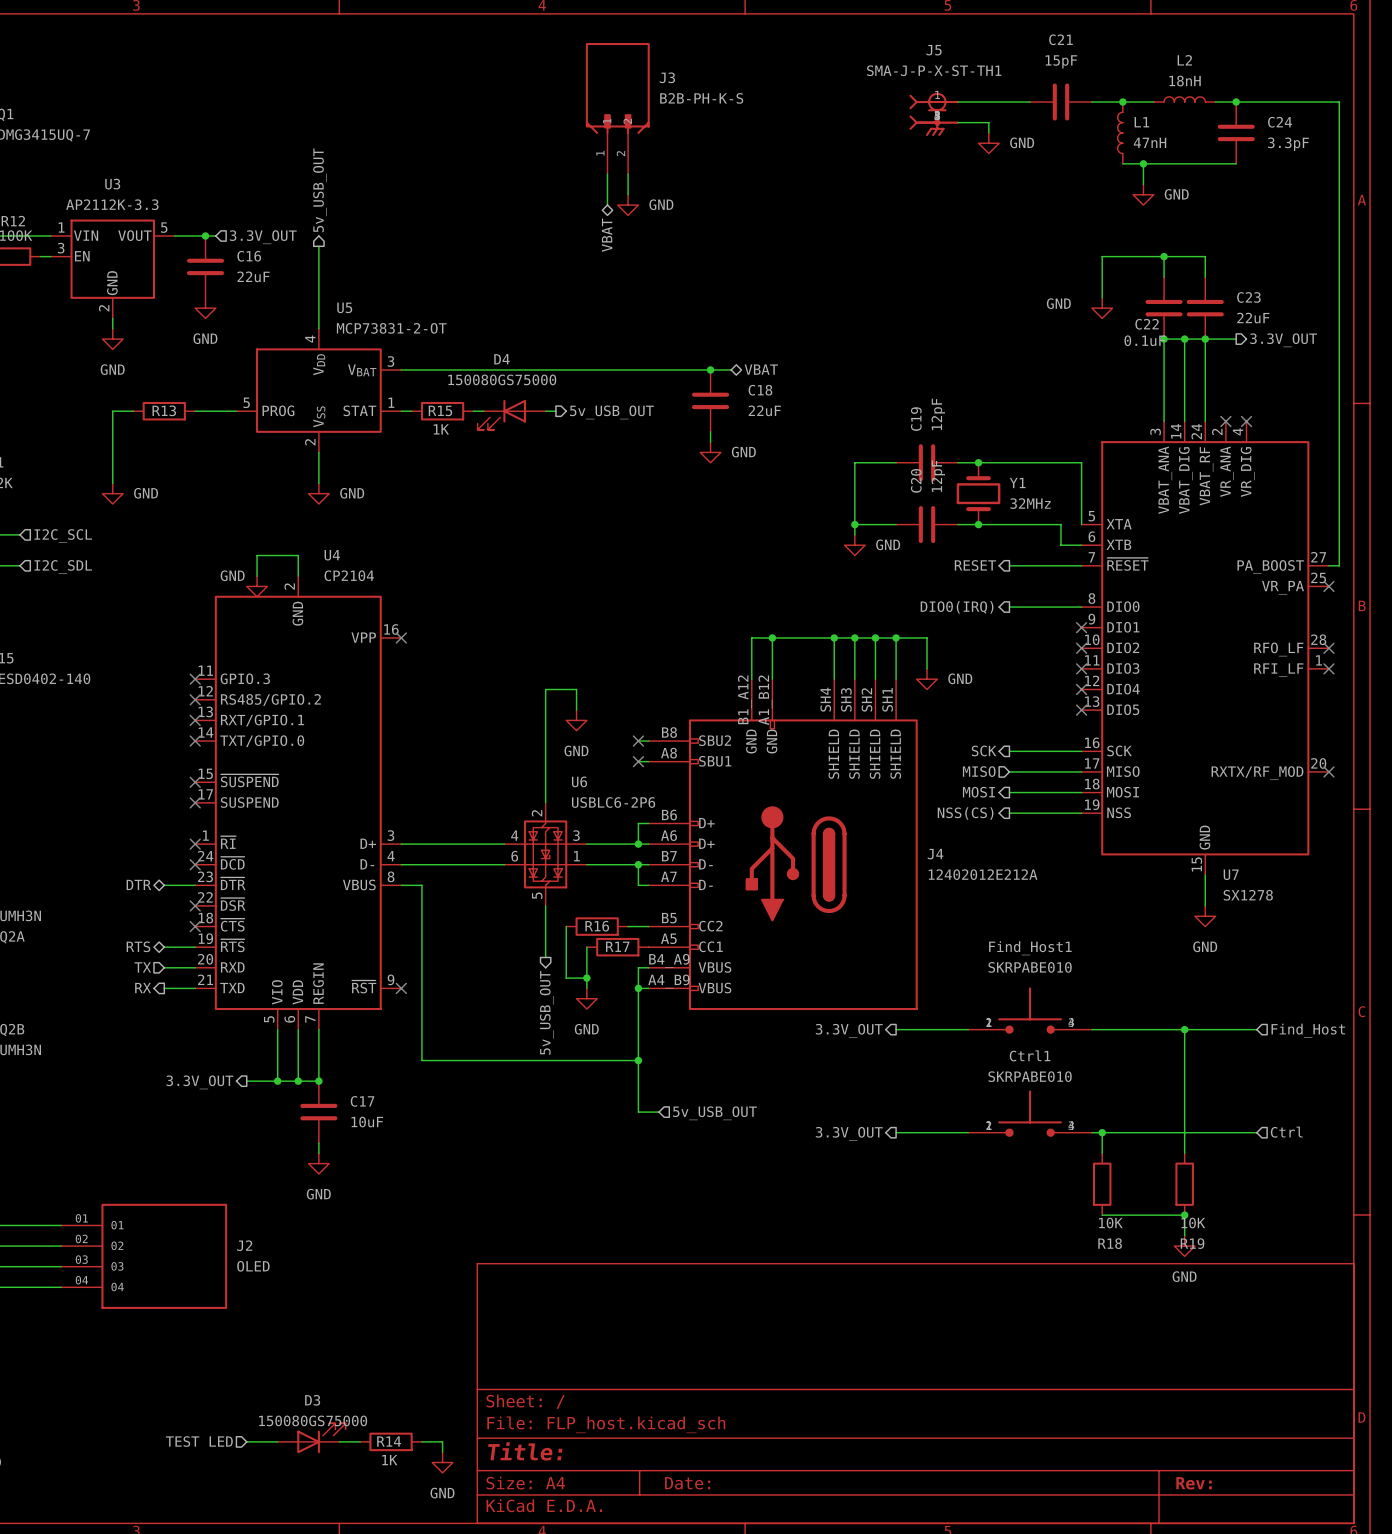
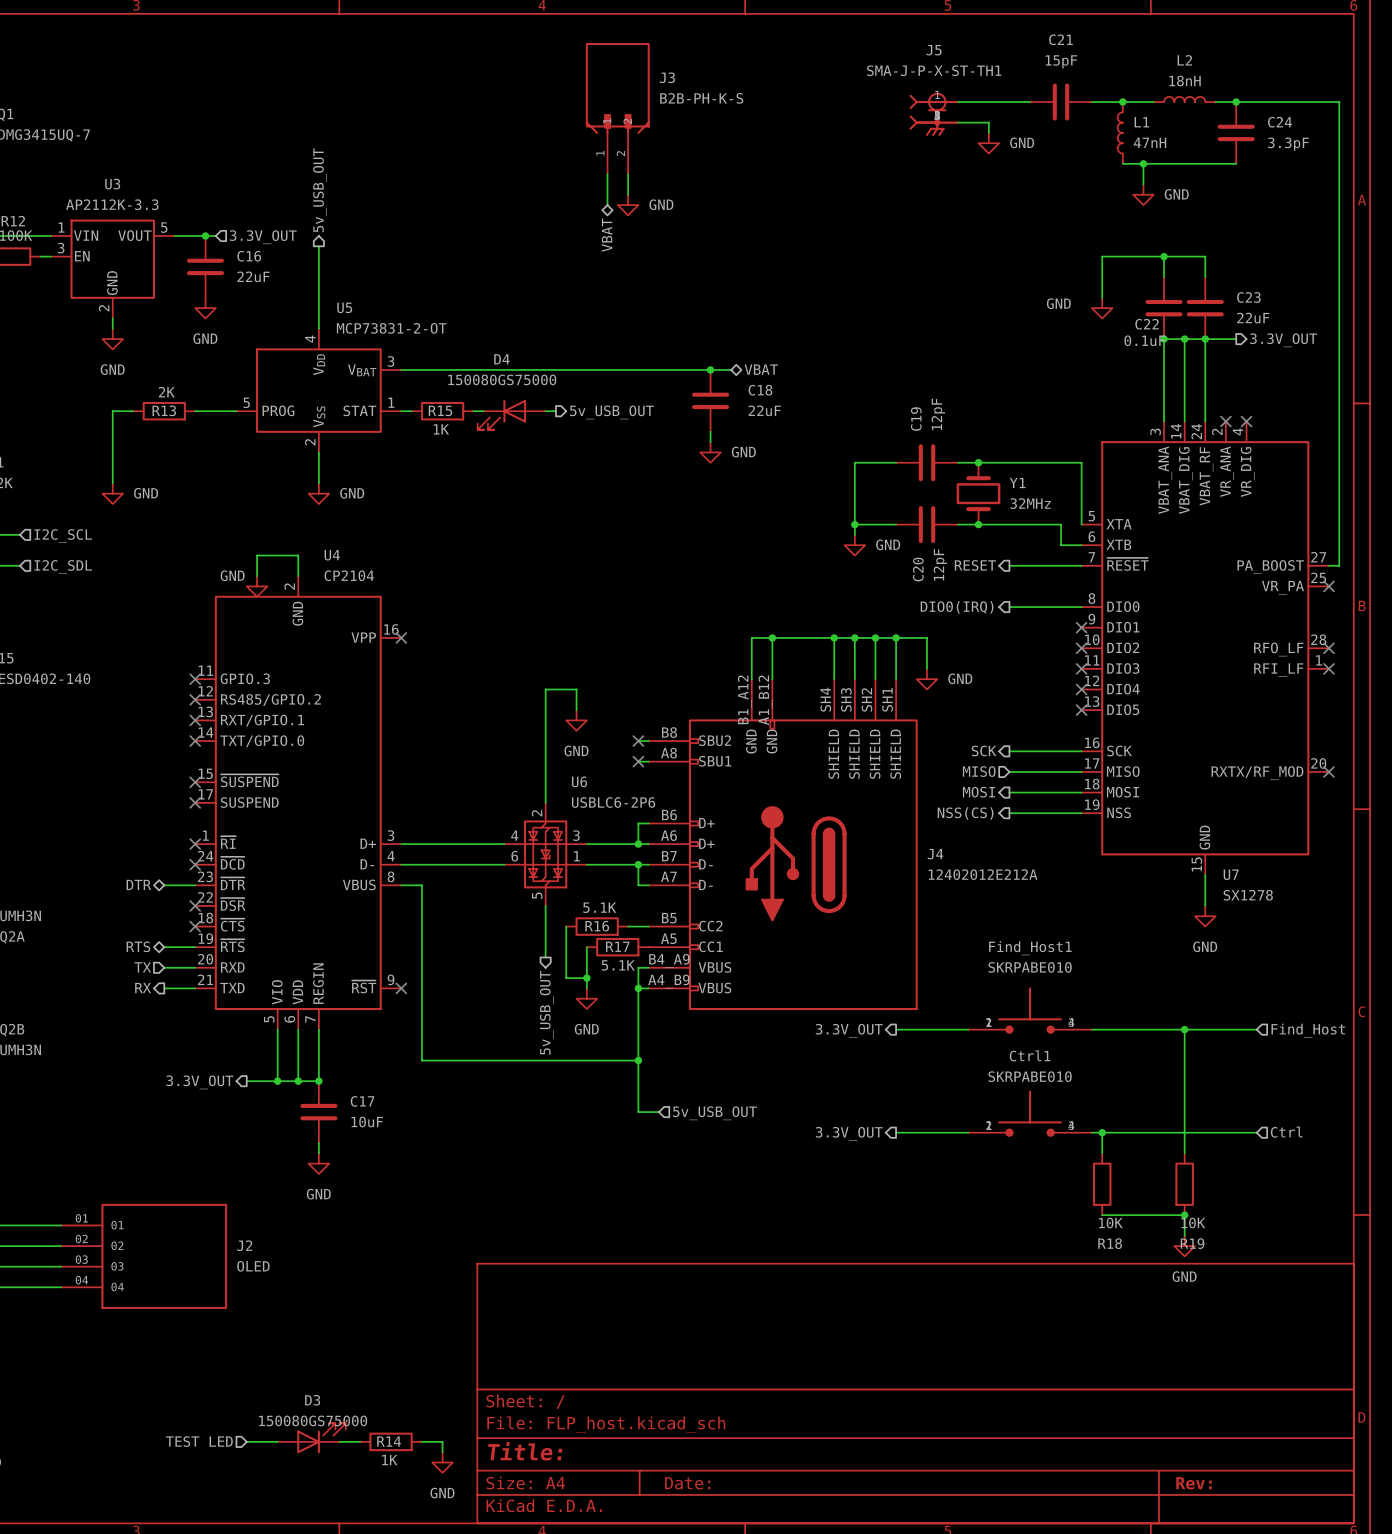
R13 value: none -> 2K (166, 392)
C20 value position: 12pF (938, 476) -> 12pF (940, 564)
C20 name position: C20 (916, 480) -> C20 (918, 569)
R16 value: none -> 5.1K (599, 907)
R17 value: none -> 5.1K (618, 965)

